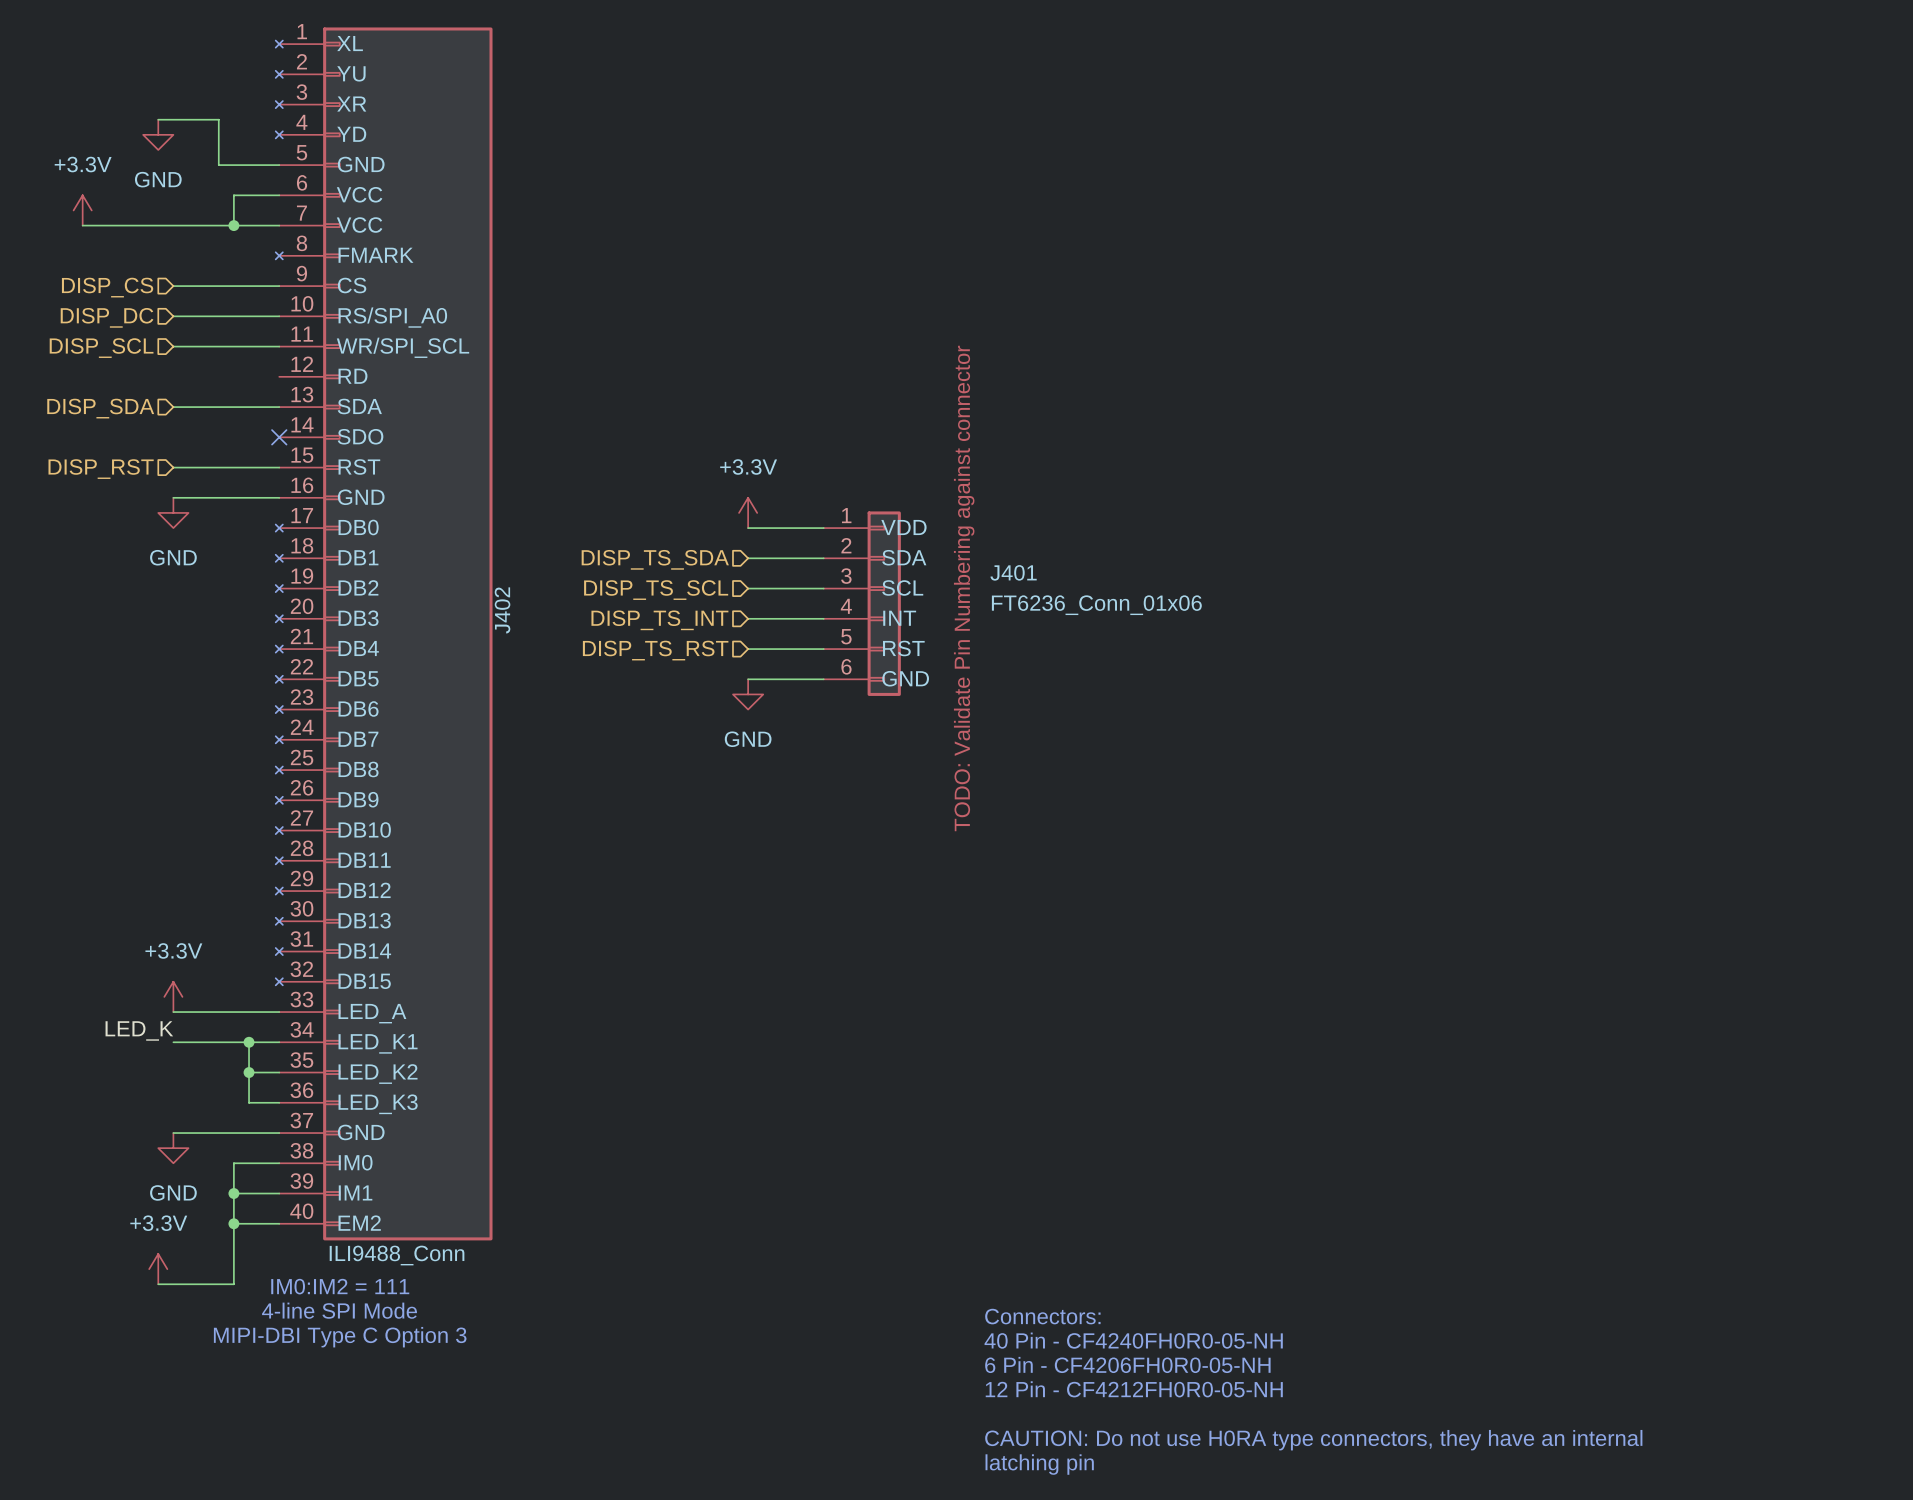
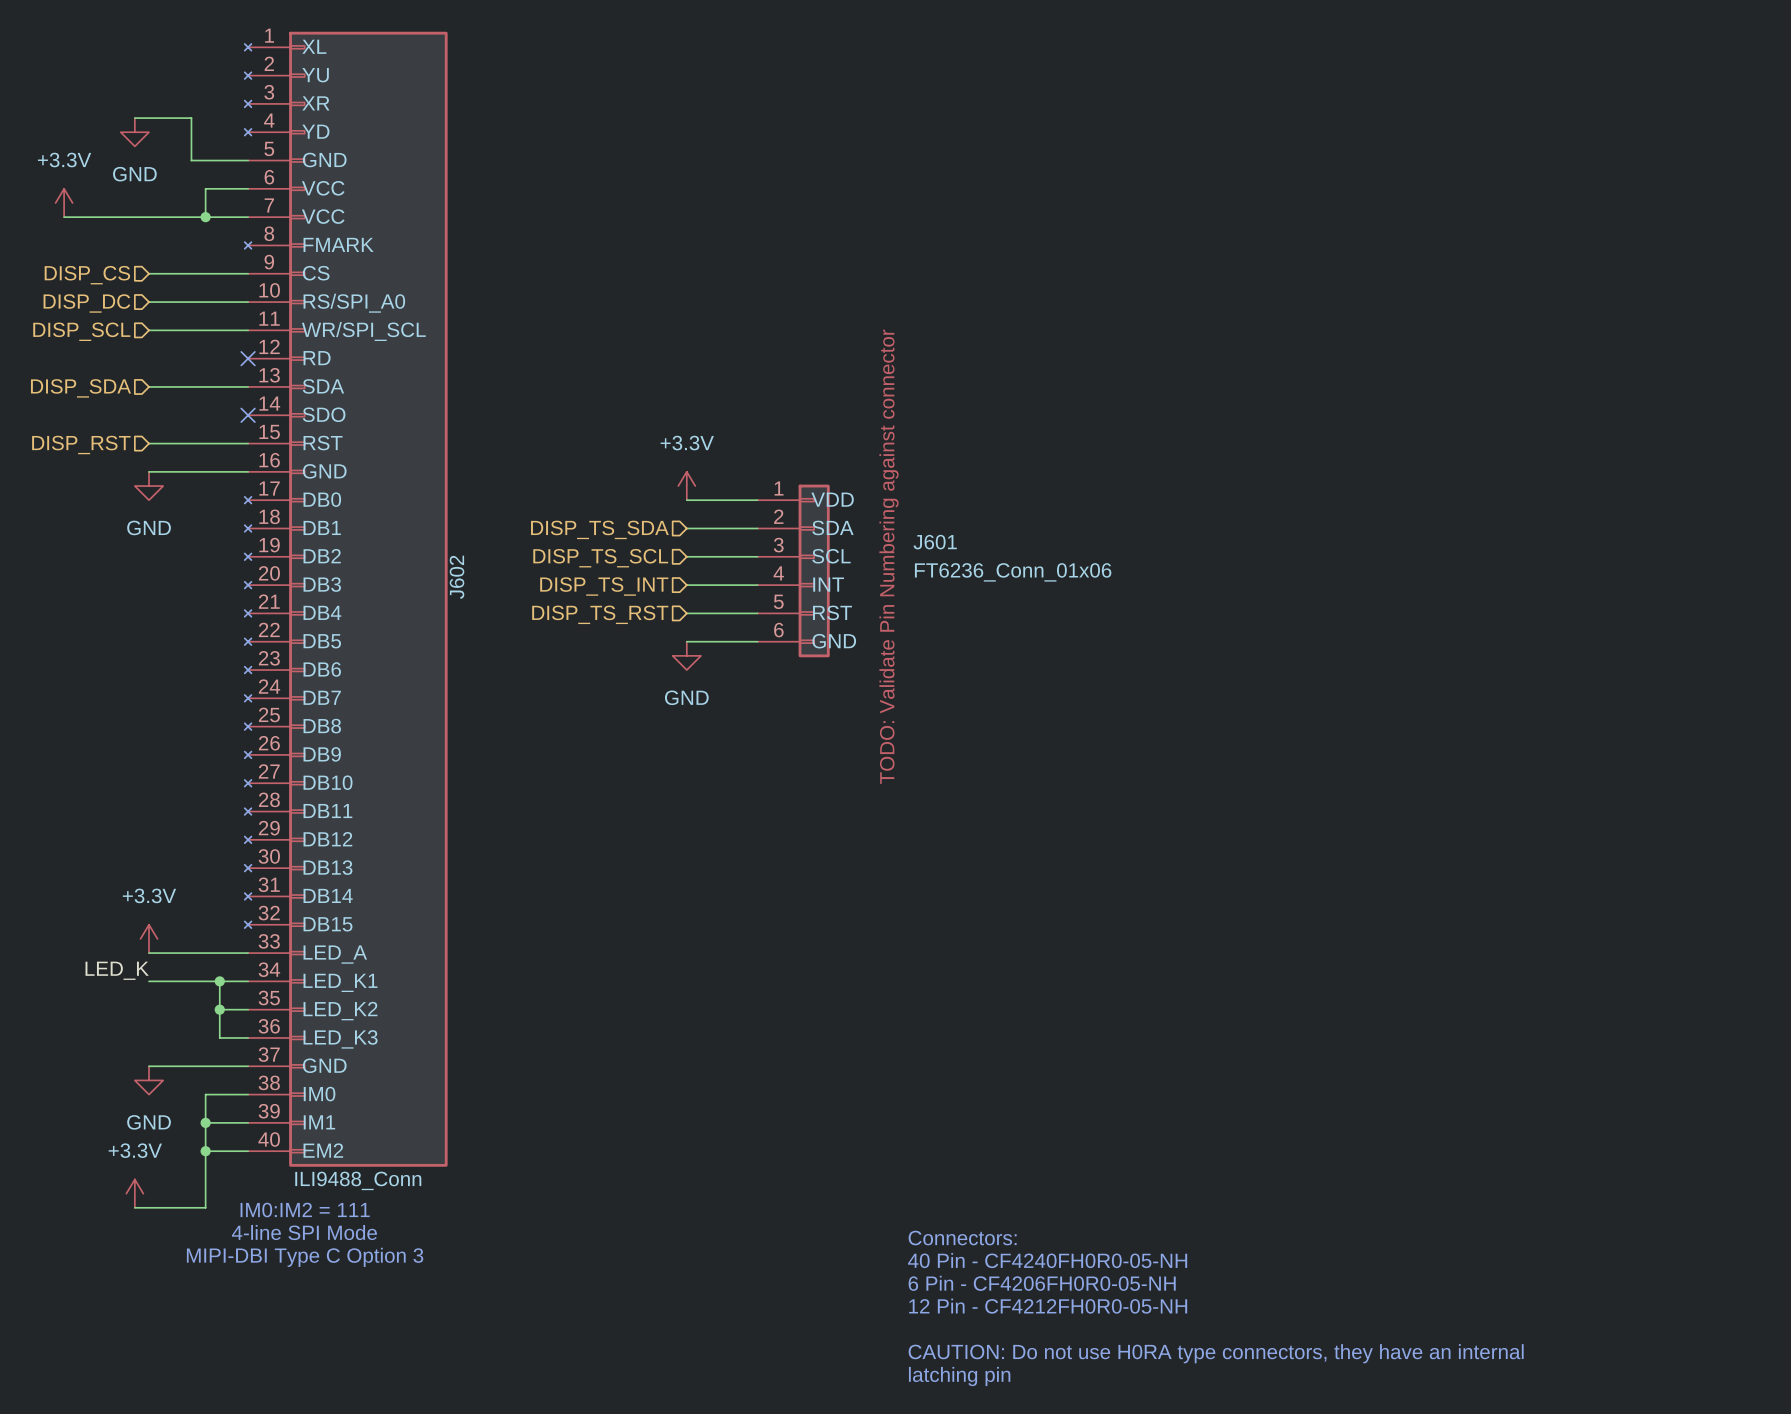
no-connect mark: none -> (248, 358)
J401 name: J401 (1013, 572) -> J601 (935, 542)
J402 name: J402 (502, 610) -> J602 (457, 577)

